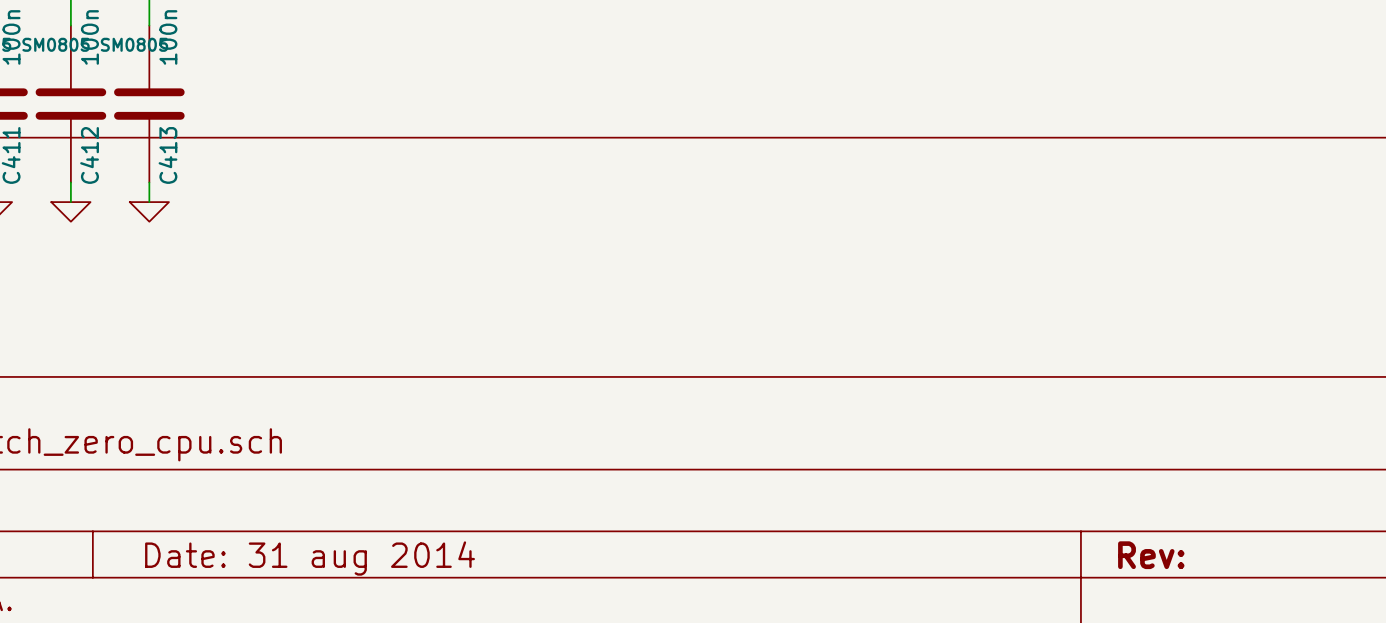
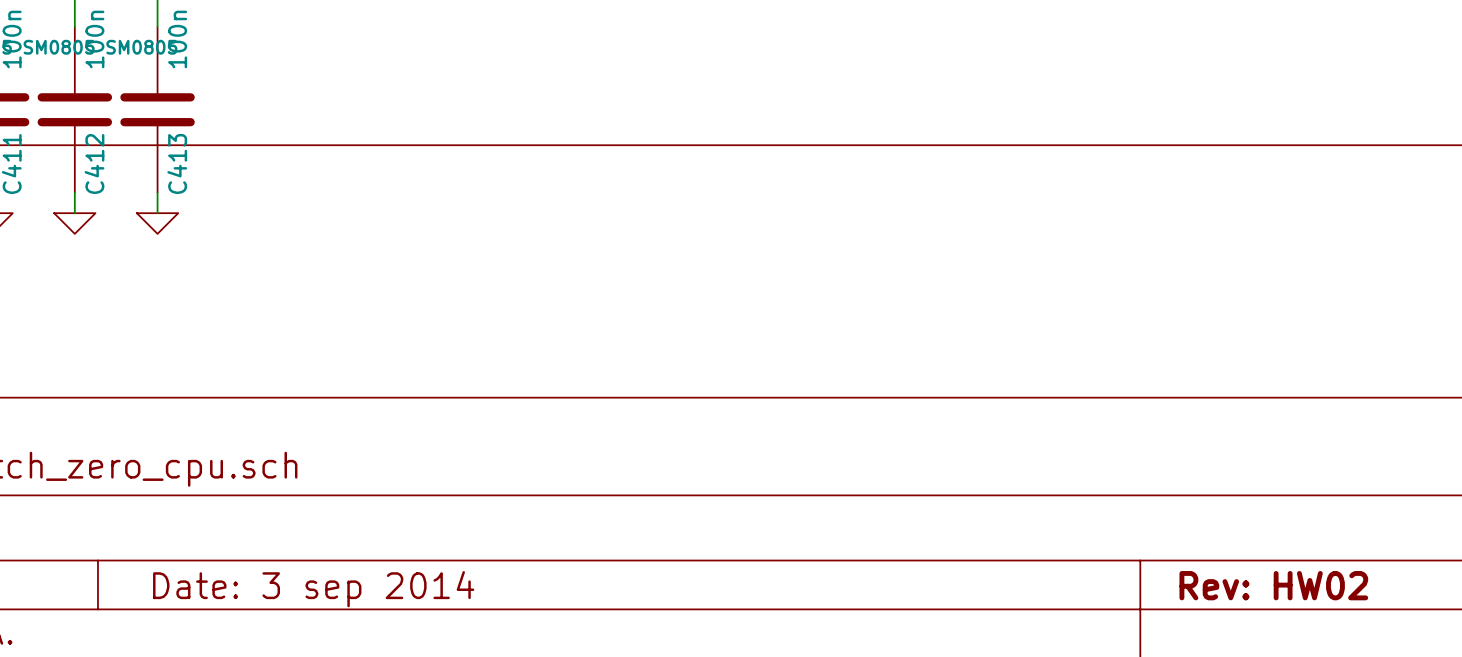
title block: Rev: (1151, 555) -> Rev: HW02 (1273, 585)
title block: Date: 31 aug 2014 (310, 558) -> Date: 3 sep 2014 (313, 589)

